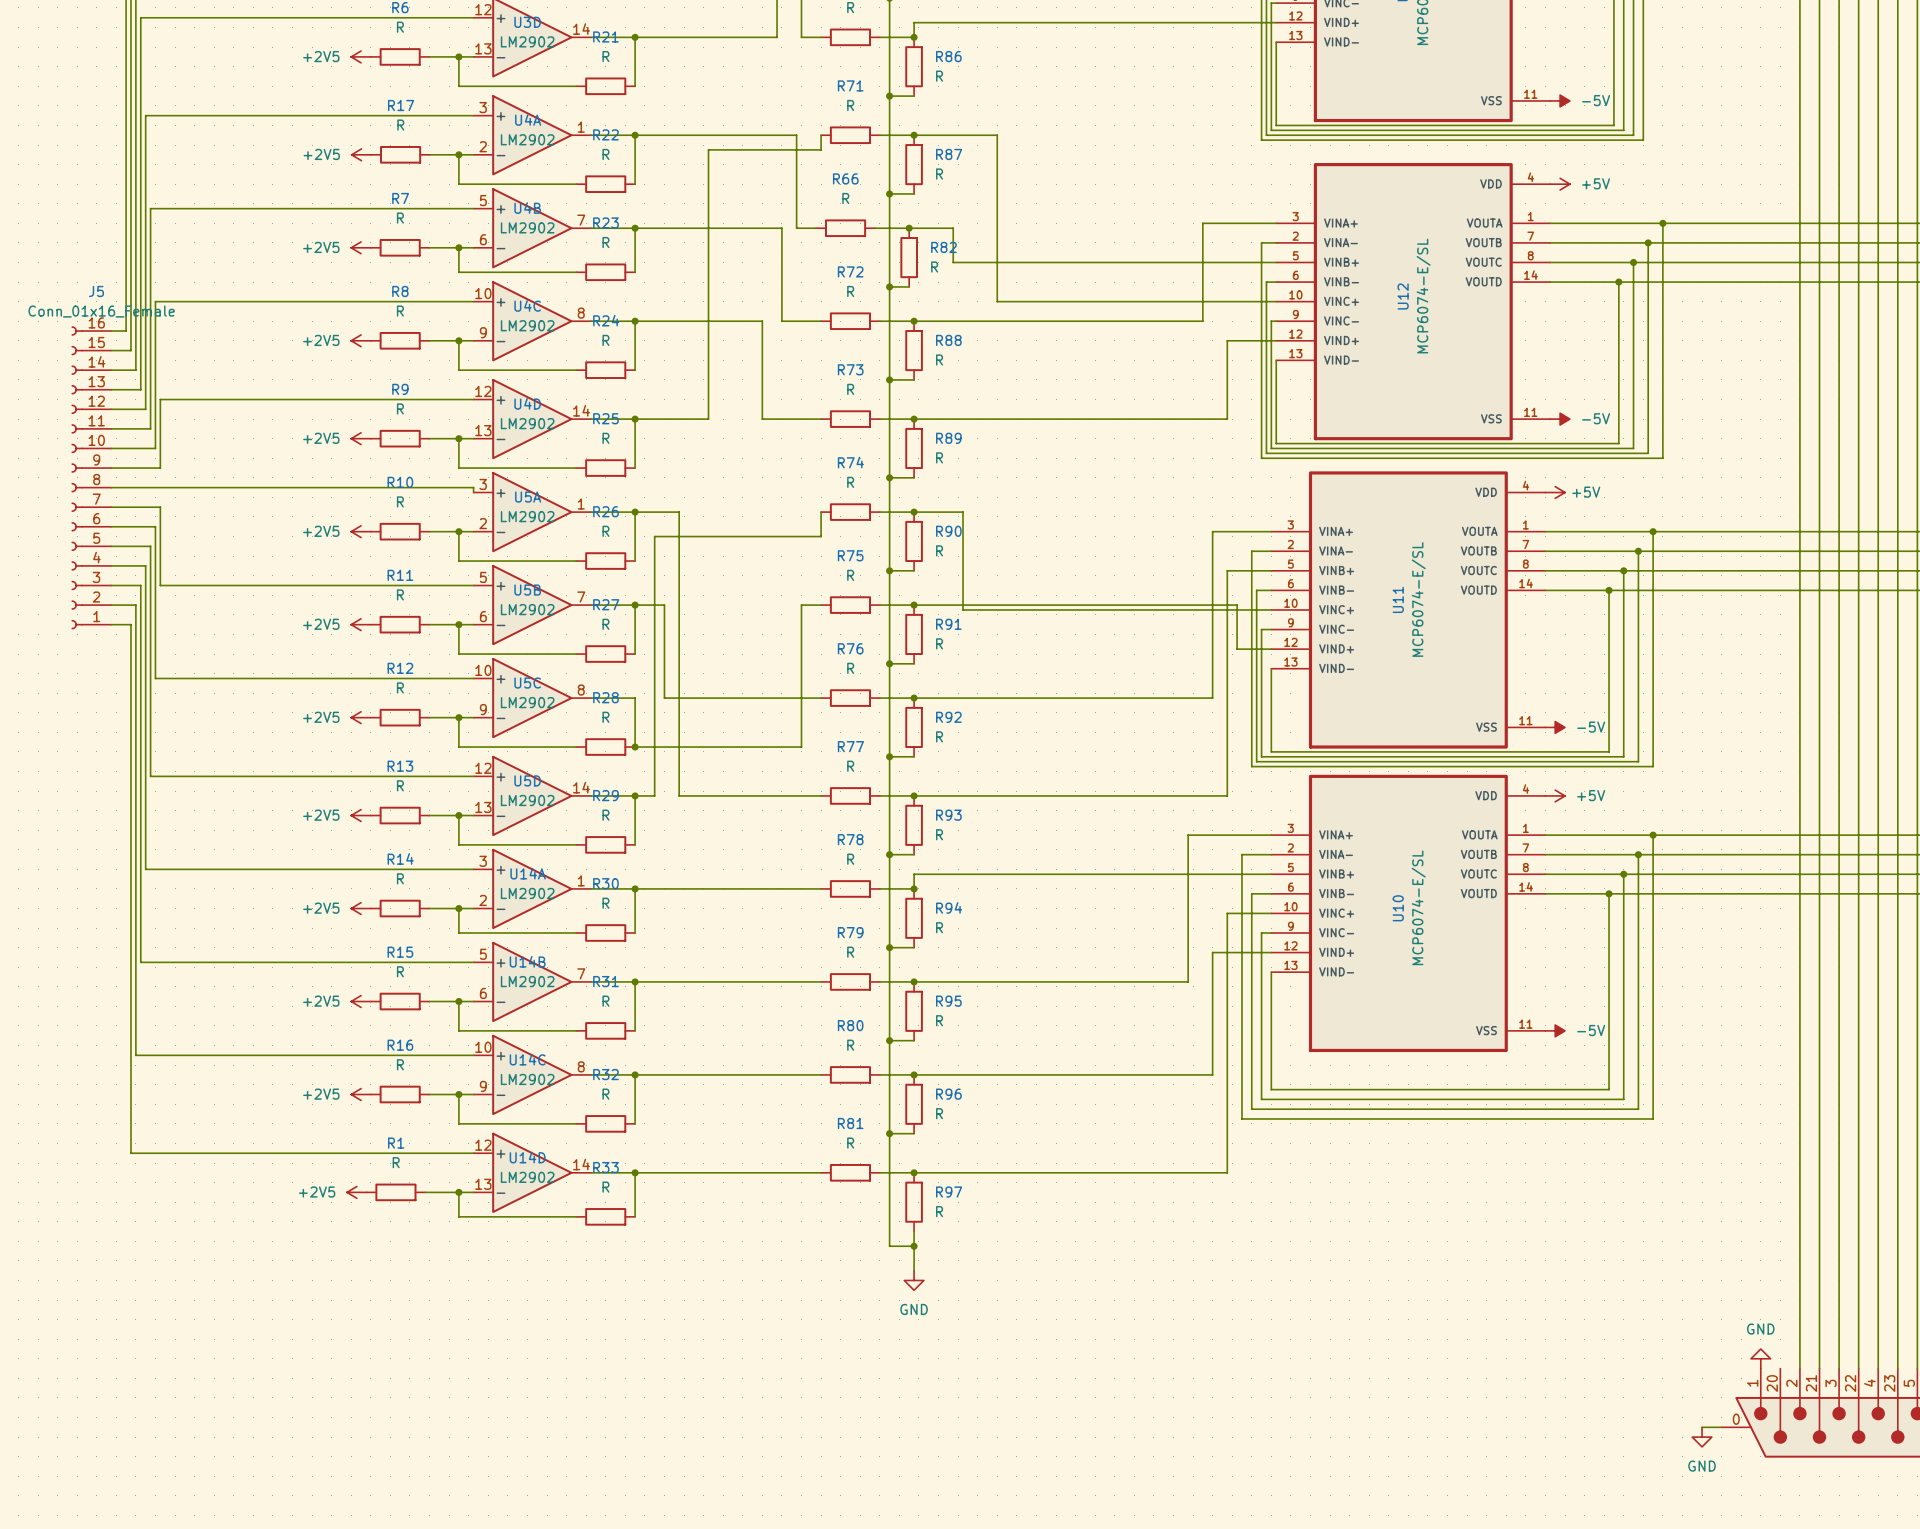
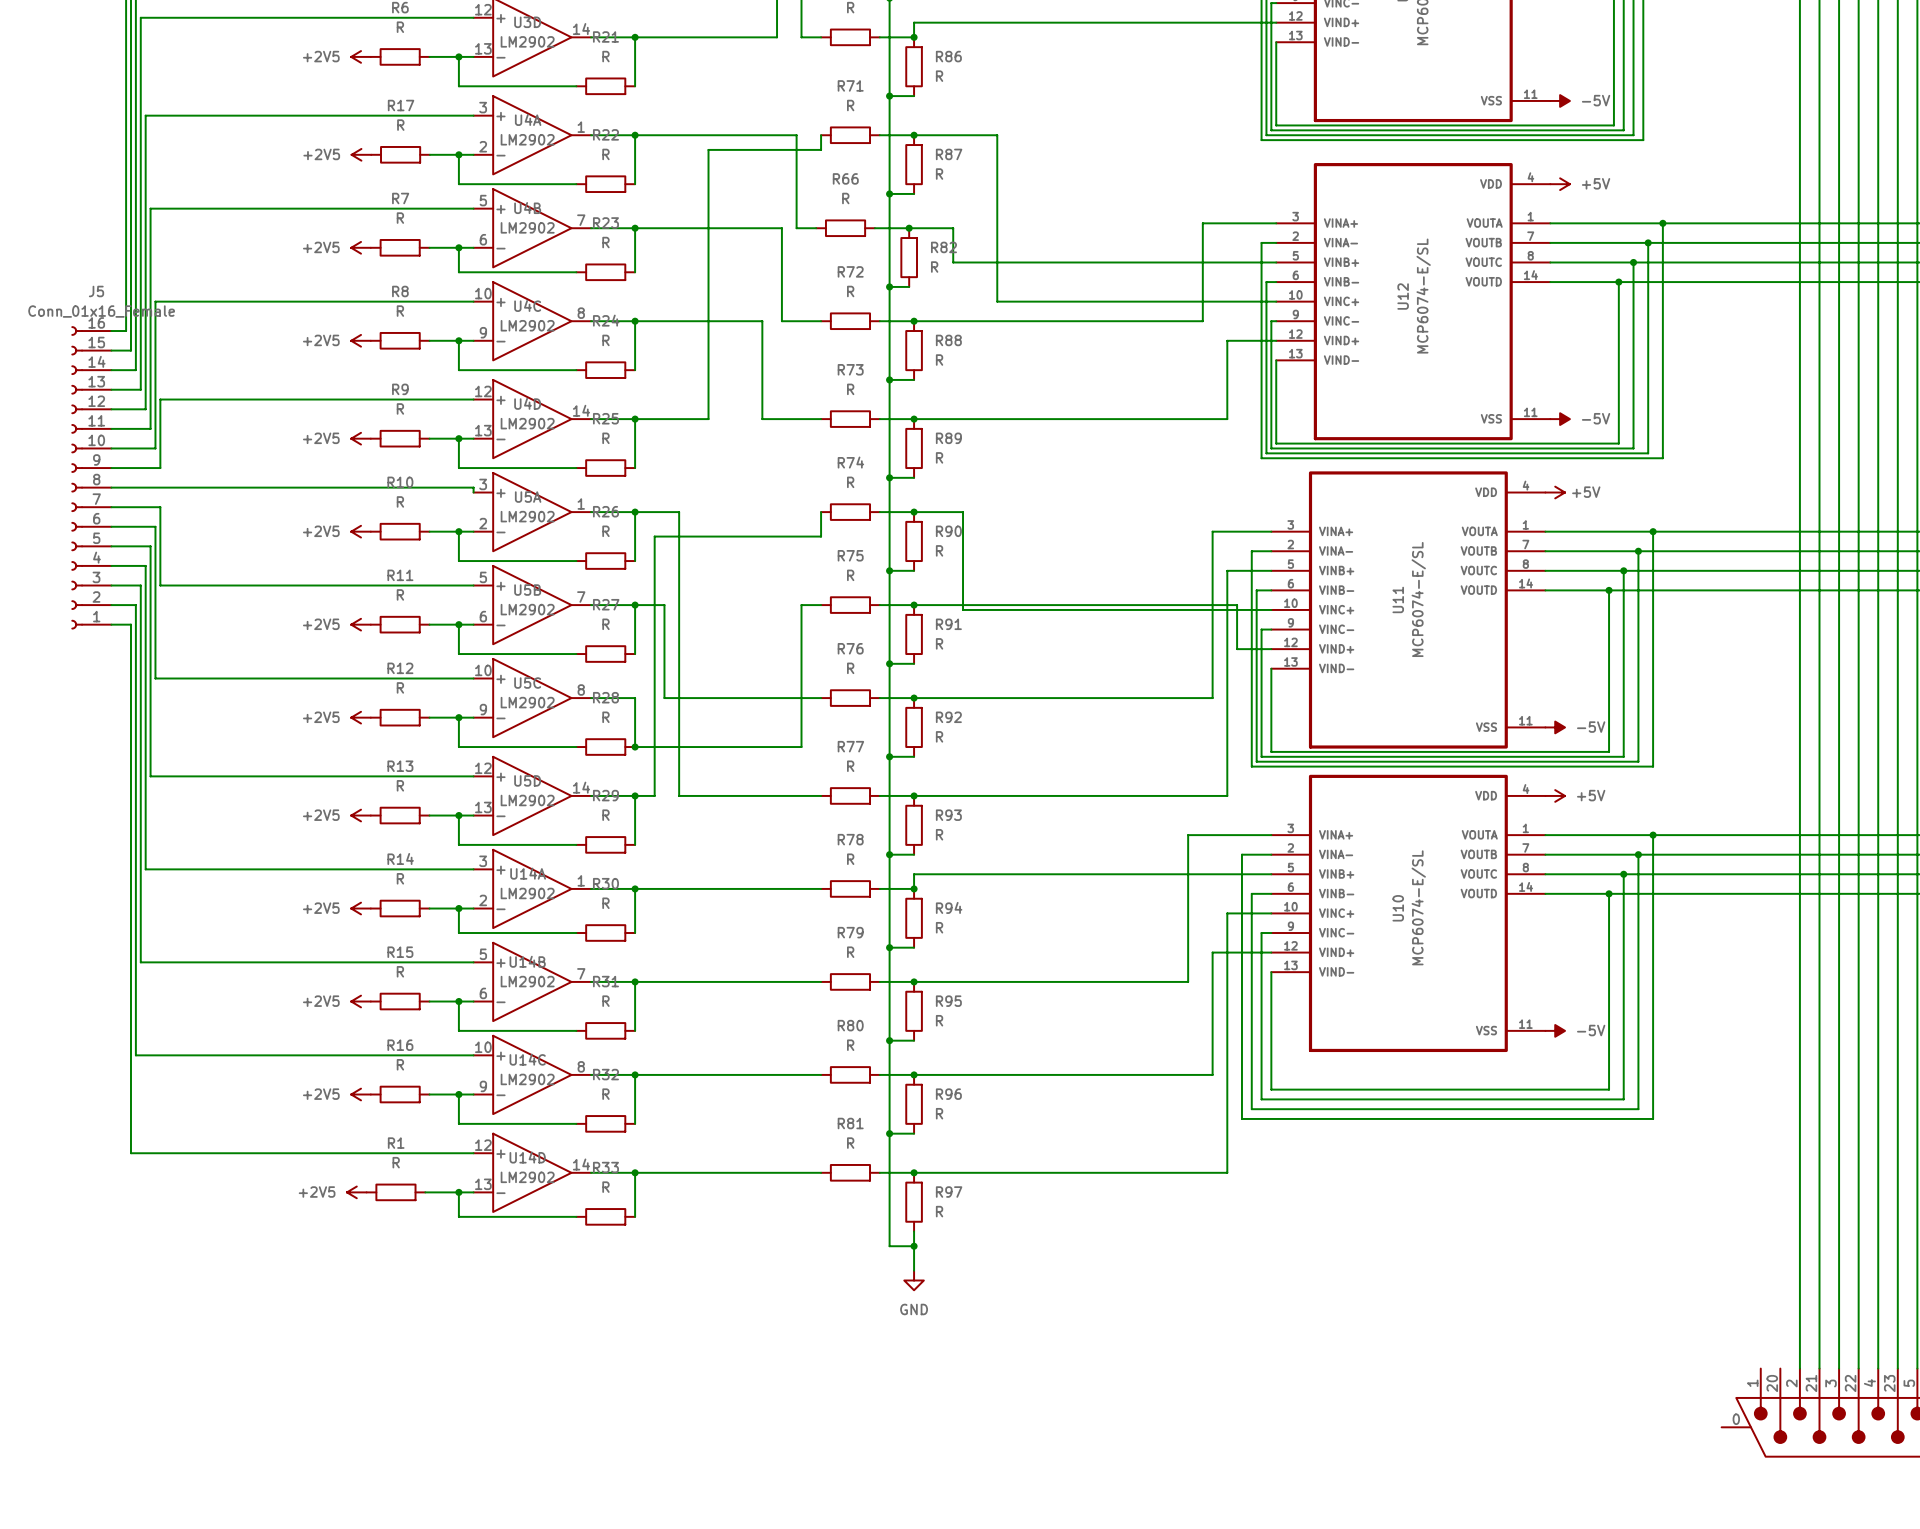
power symbol: GND (1760, 1358) -> none
wire: (1702, 1427) (1721, 1427) -> none
power symbol: GND (1702, 1437) -> none

